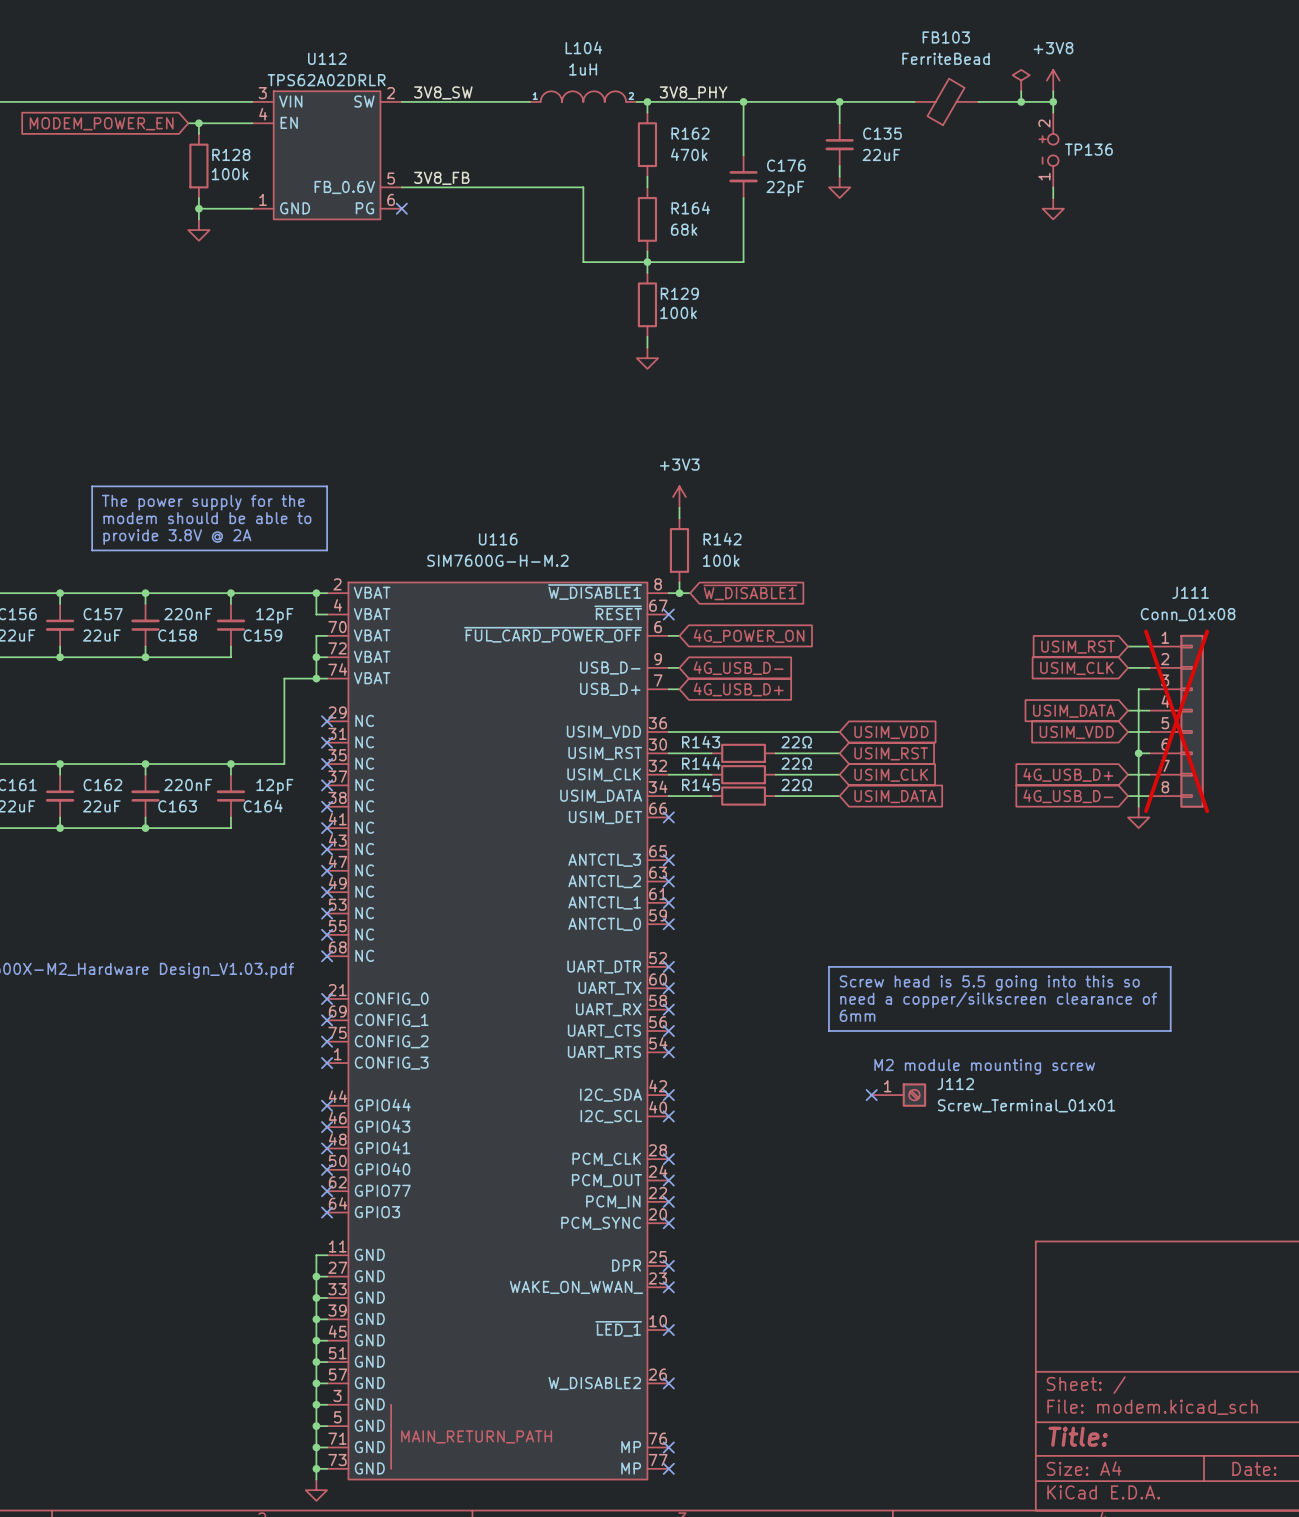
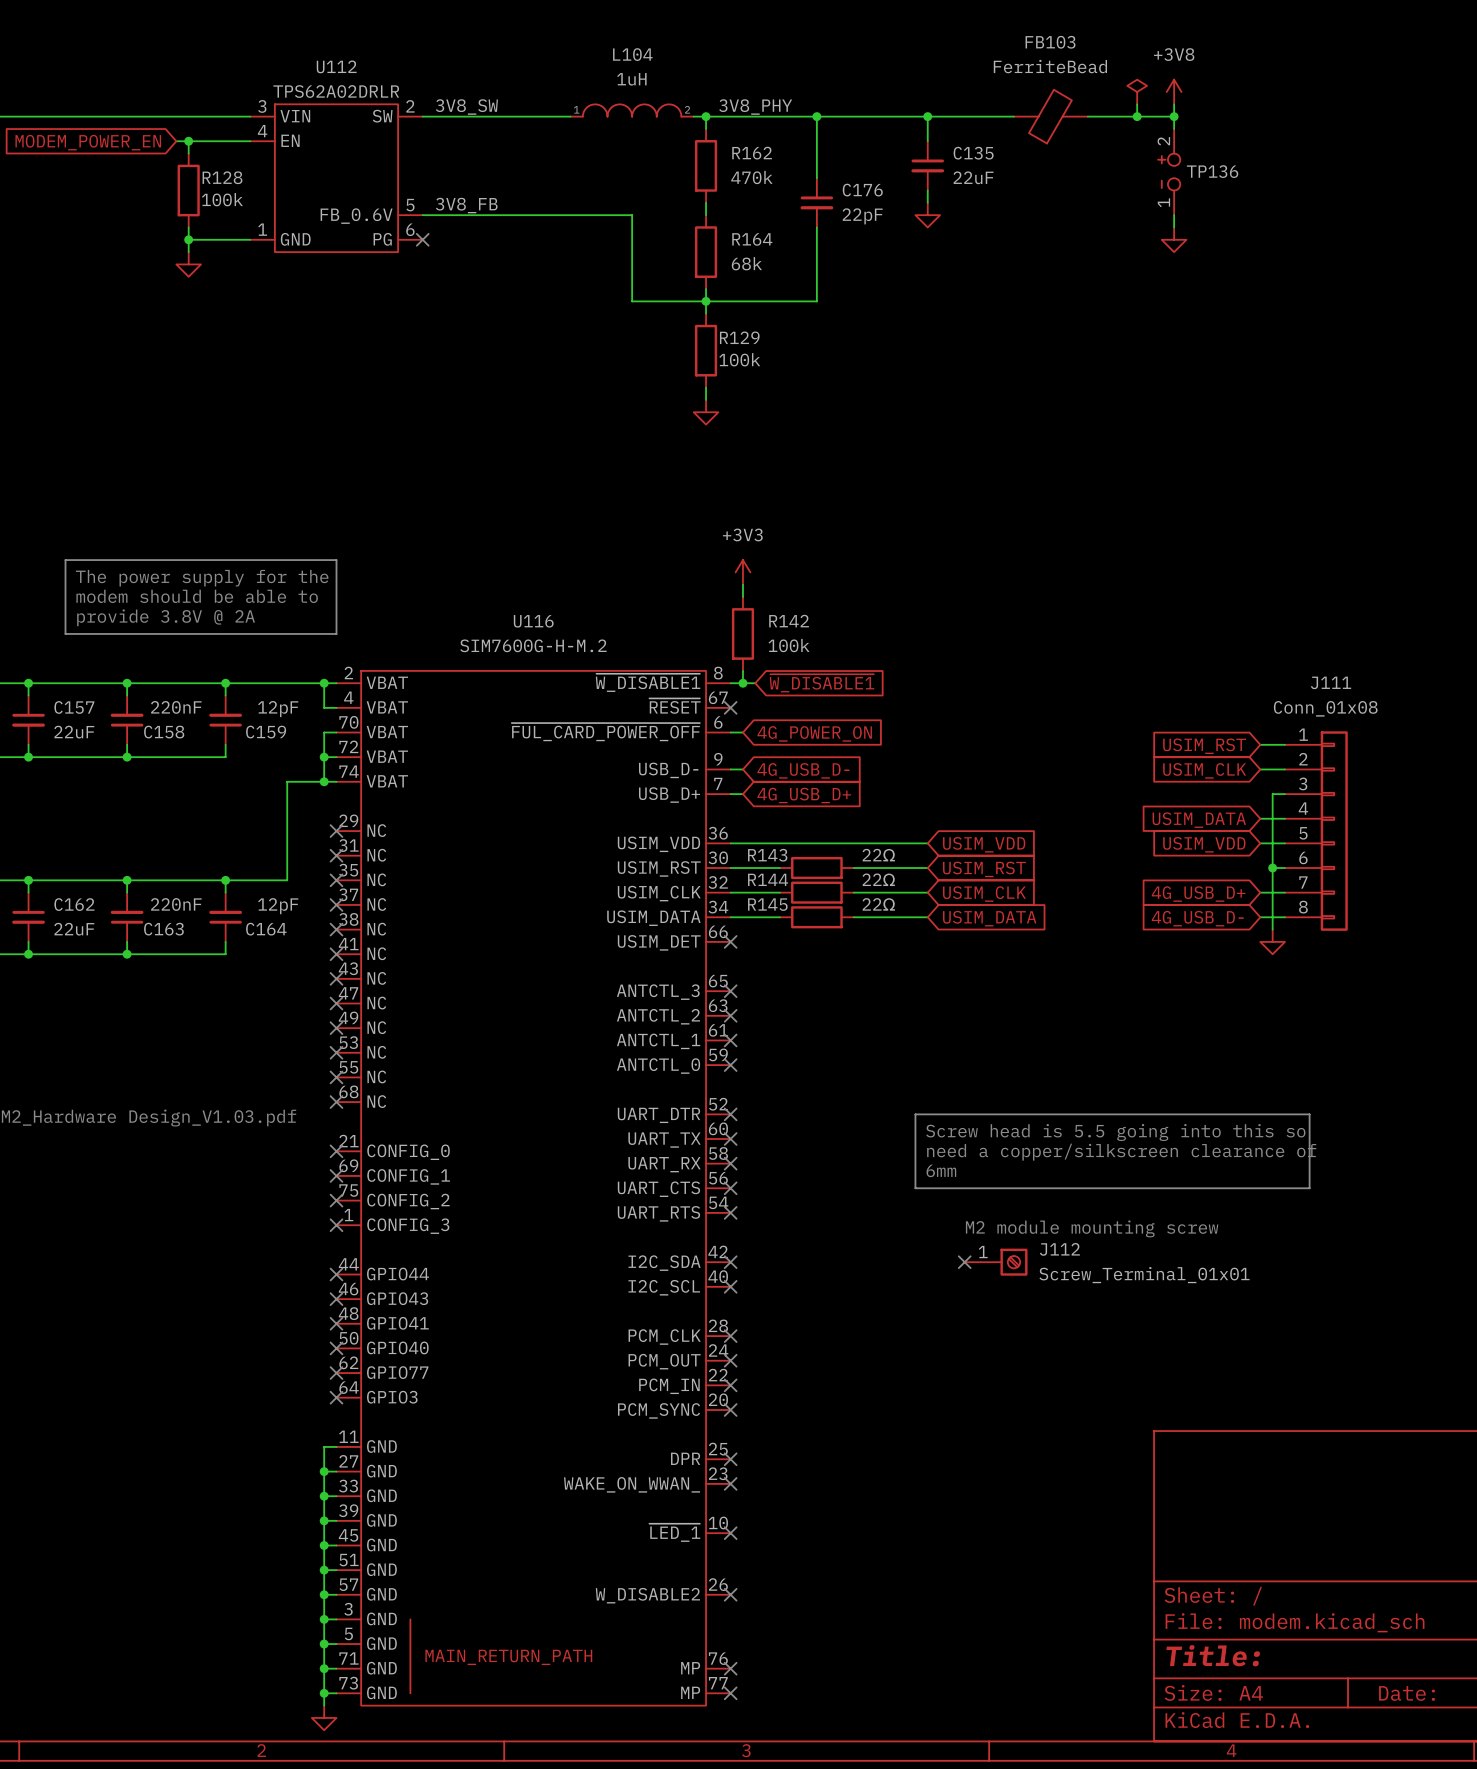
J111 do-not-place cross: (1176, 721) -> none

